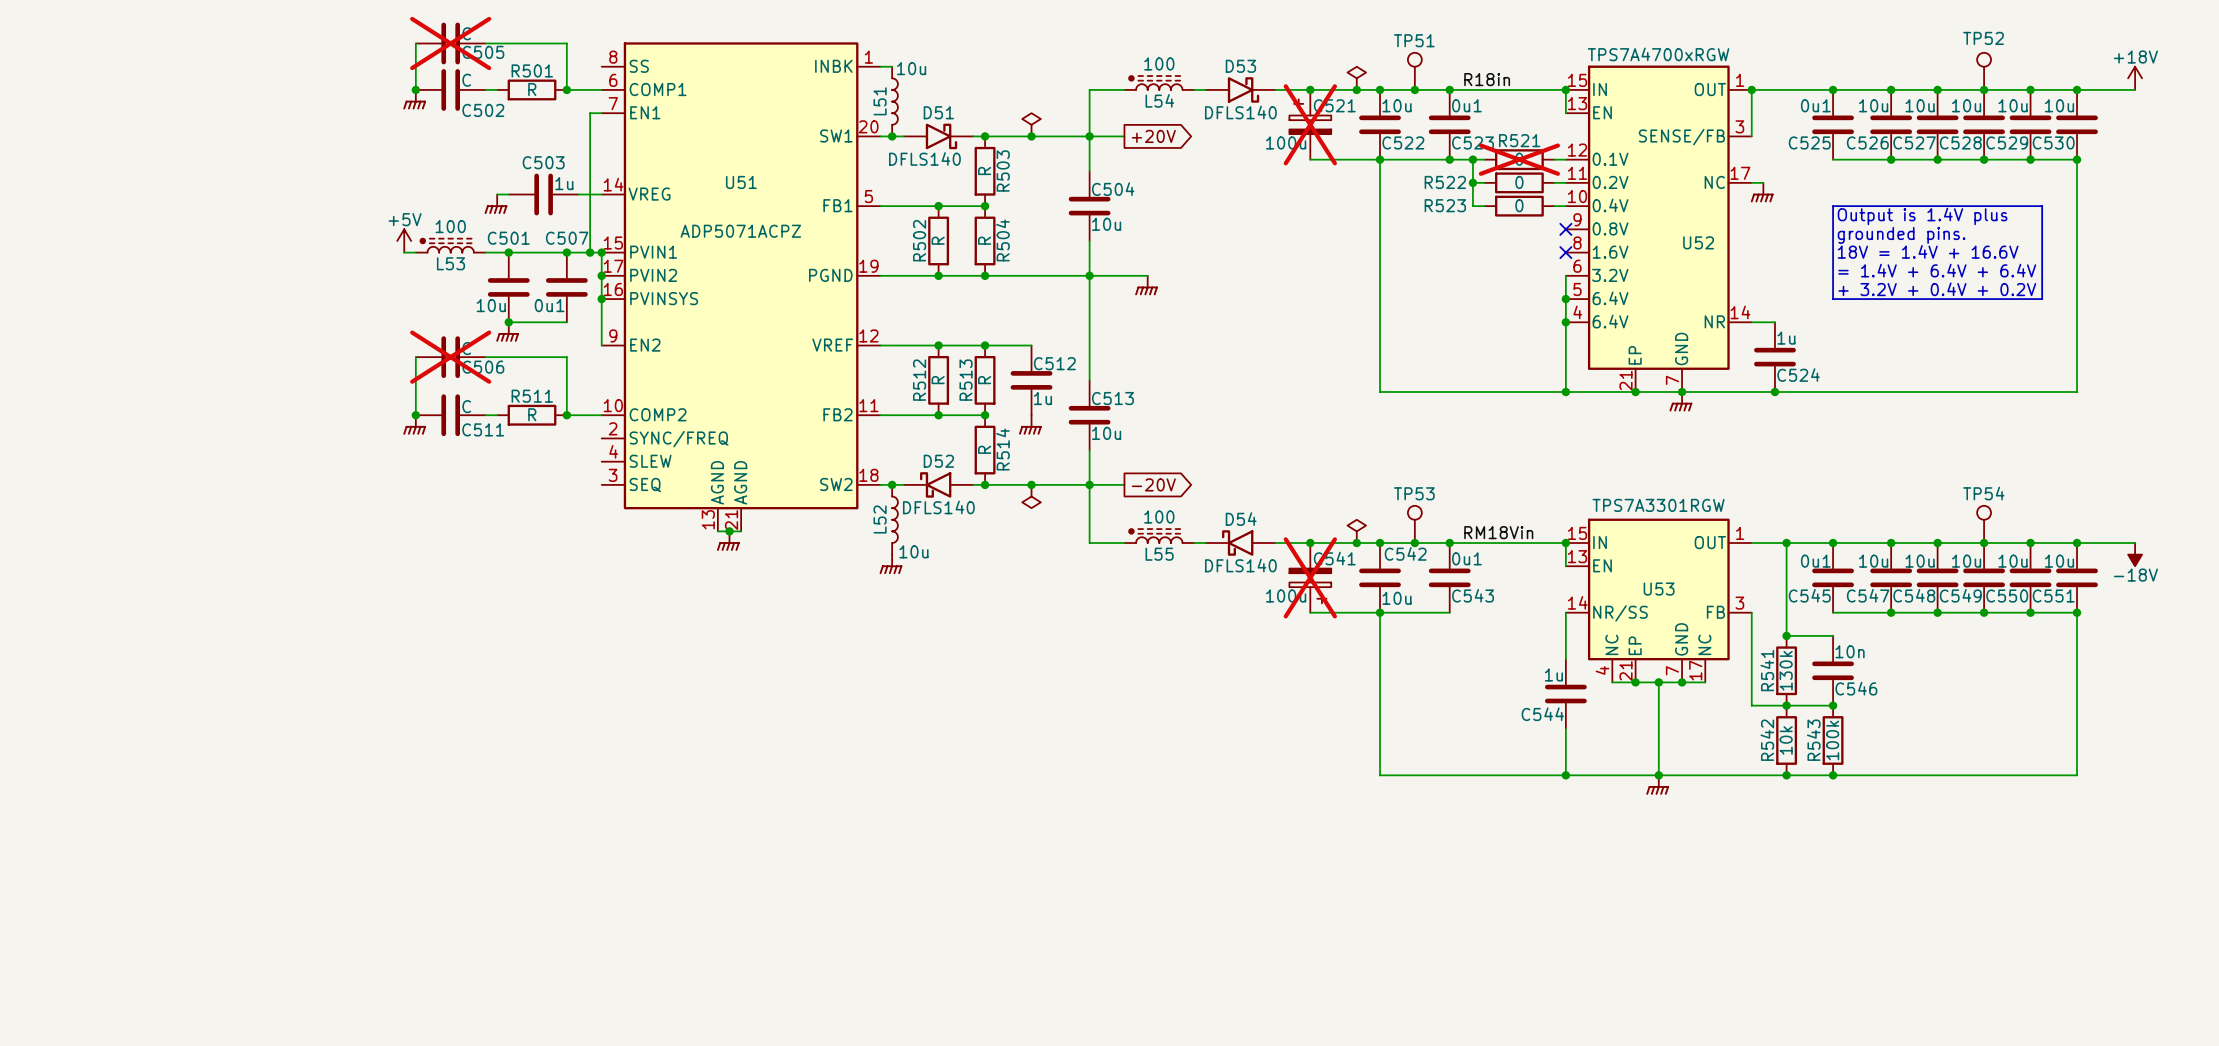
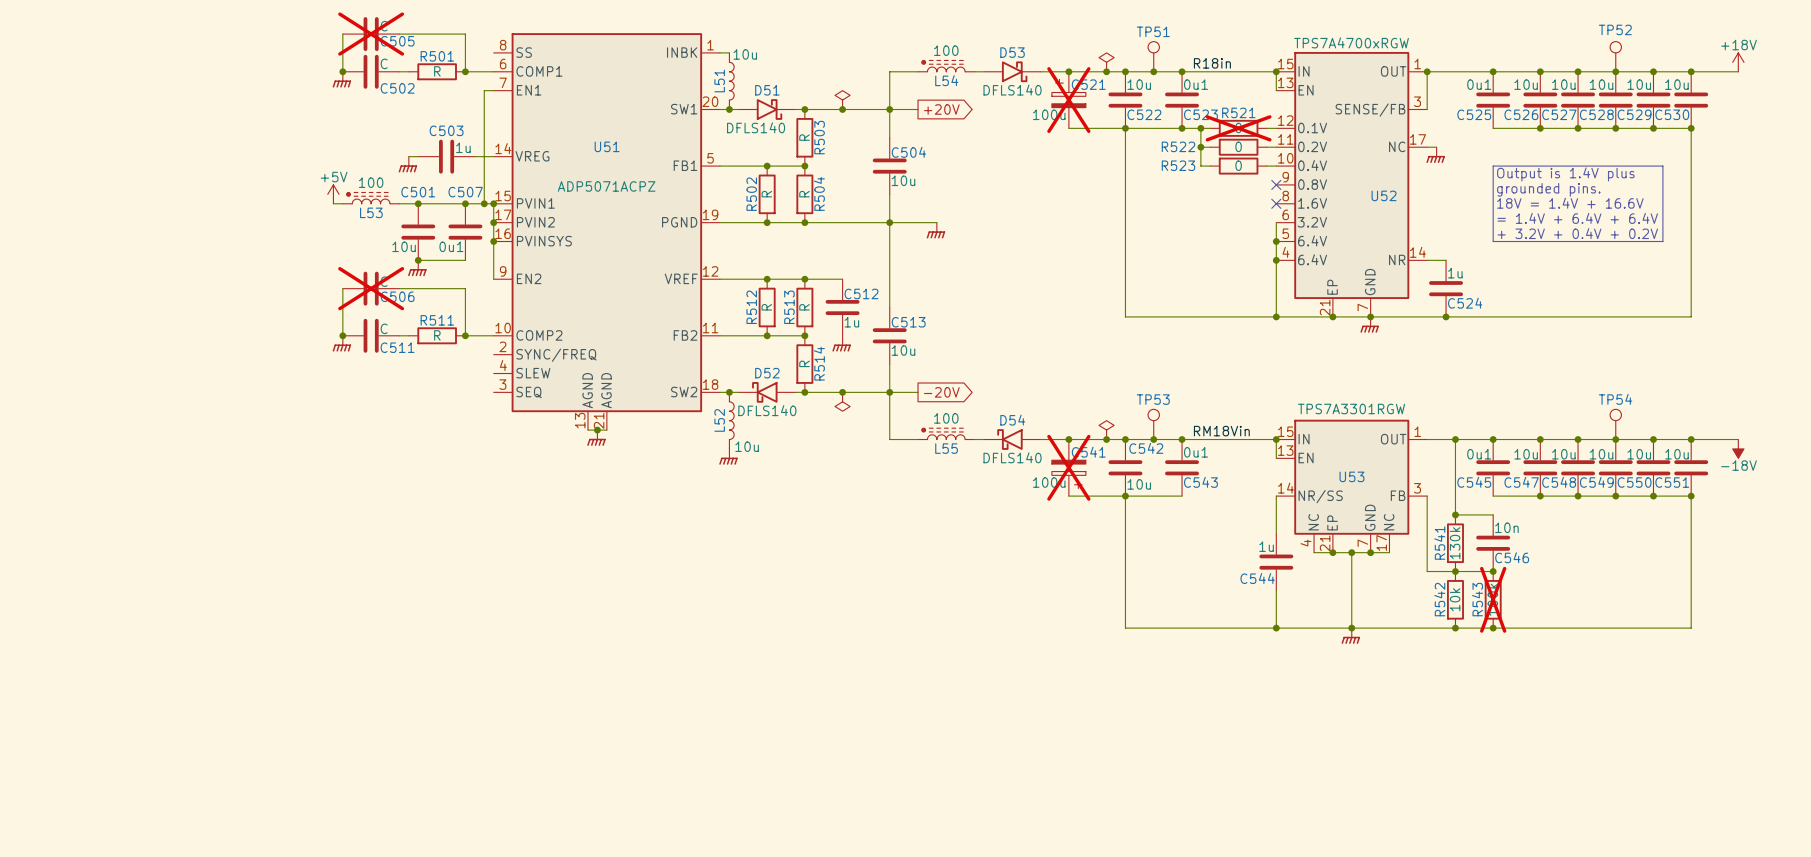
R543 do-not-place cross: none -> (1493, 599)

